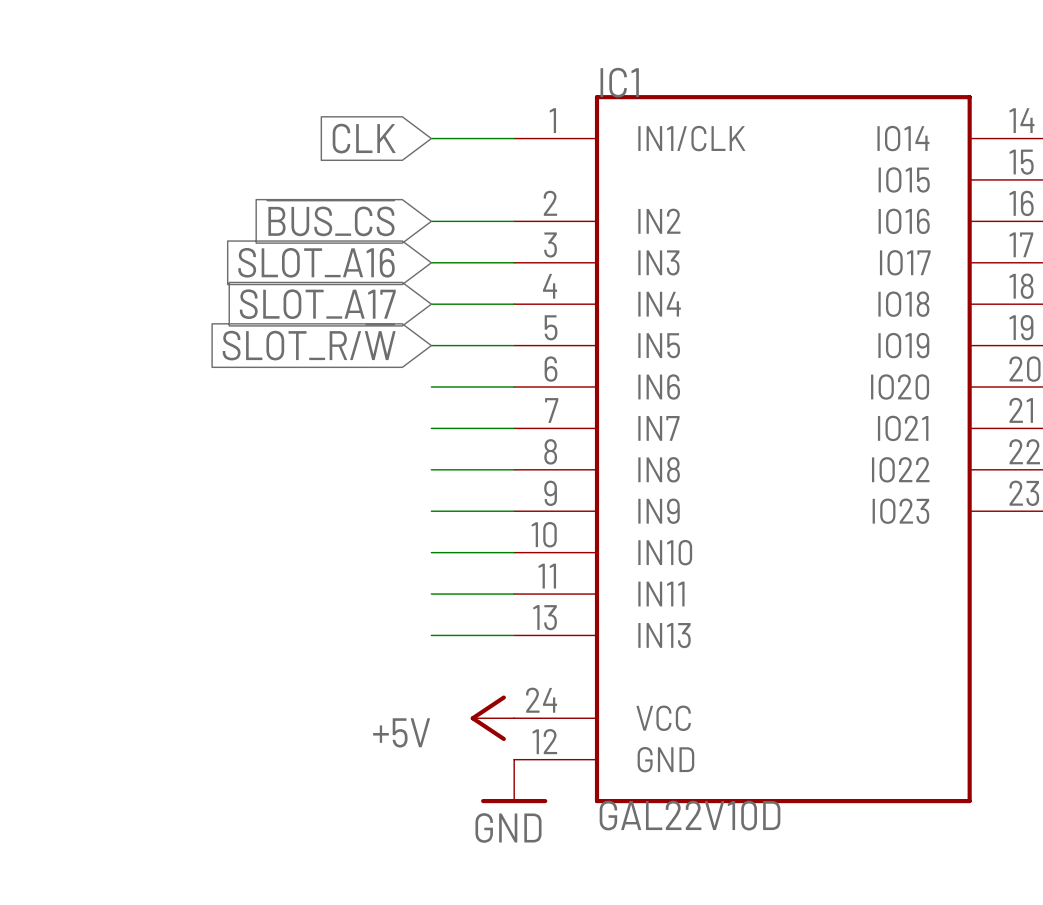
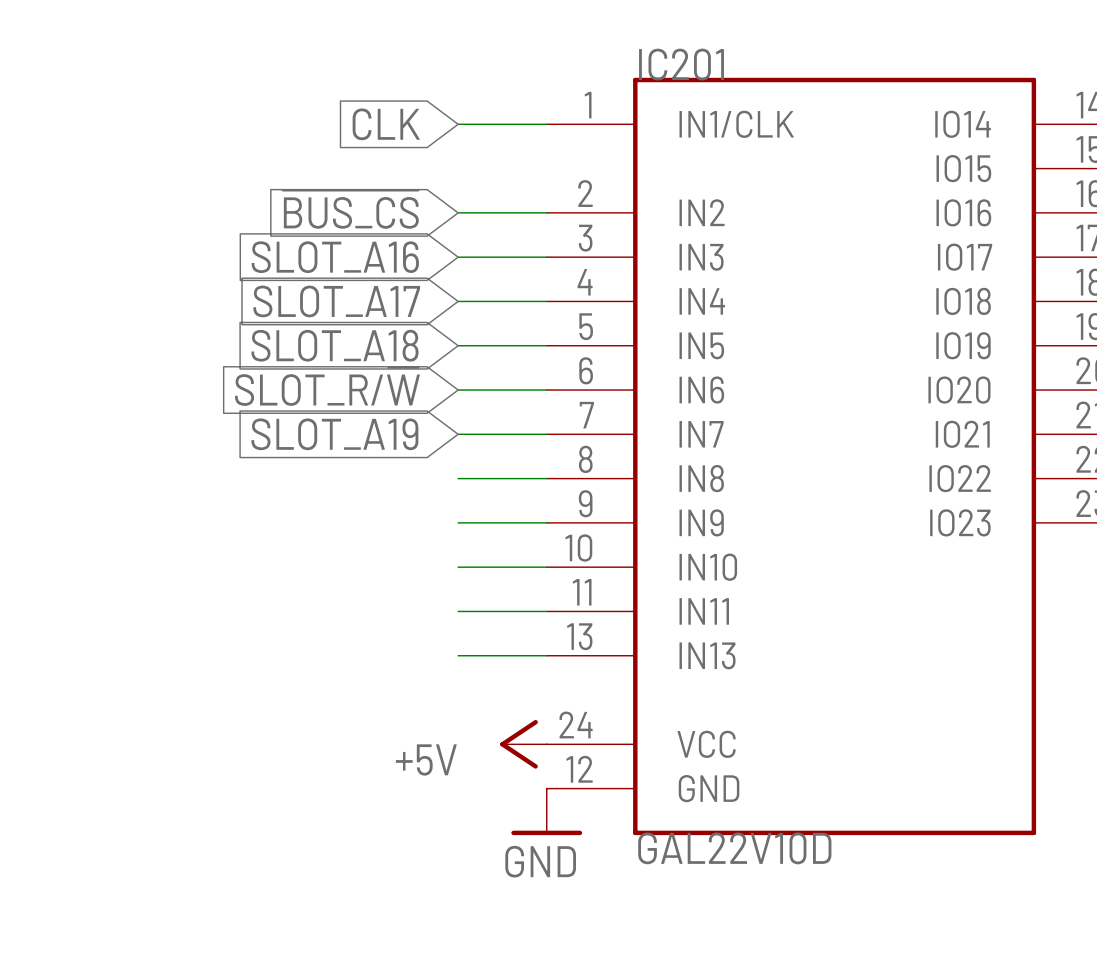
IC1 name: IC1 (619, 82) -> IC201 (681, 64)
global label: SLOT_R/~{W} (309, 342) -> SLOT_A18 (334, 345)
global label: none -> SLOT_R/~{W} (327, 386)
global label: none -> SLOT_A19 (334, 434)

